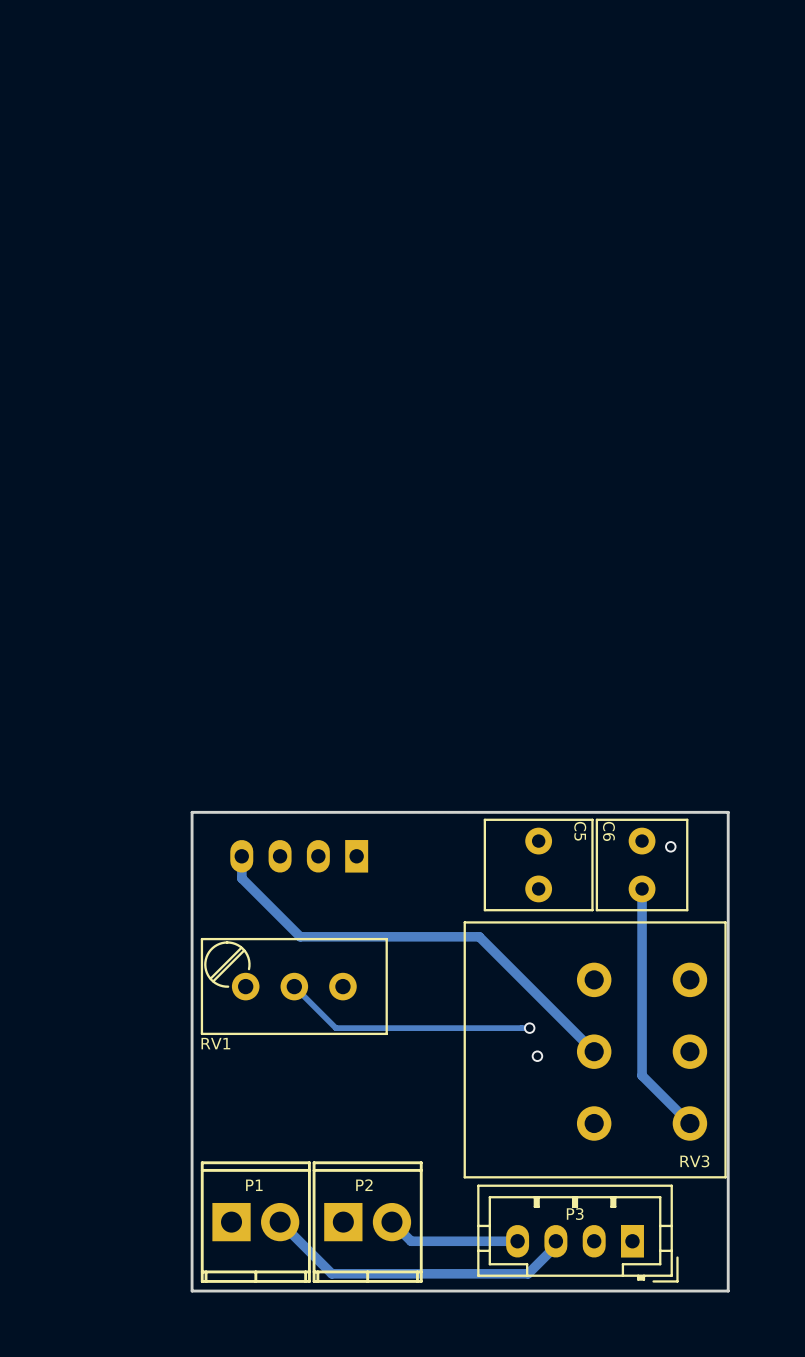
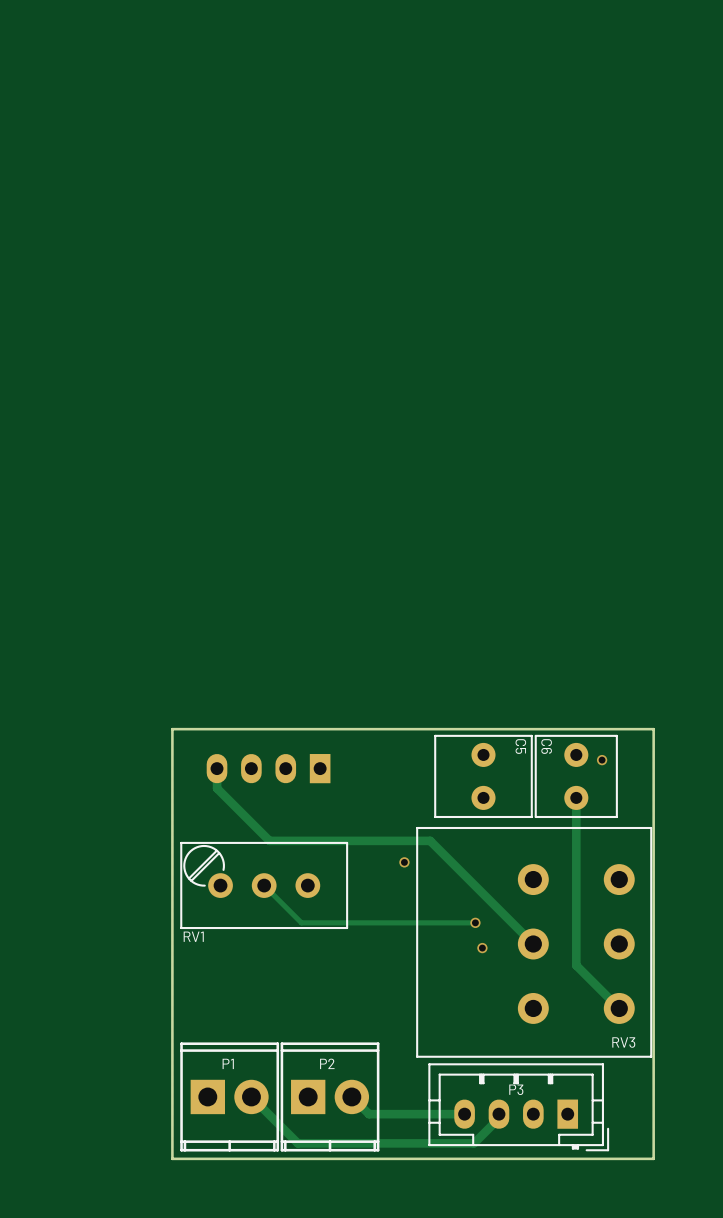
via: none -> (404, 862)

